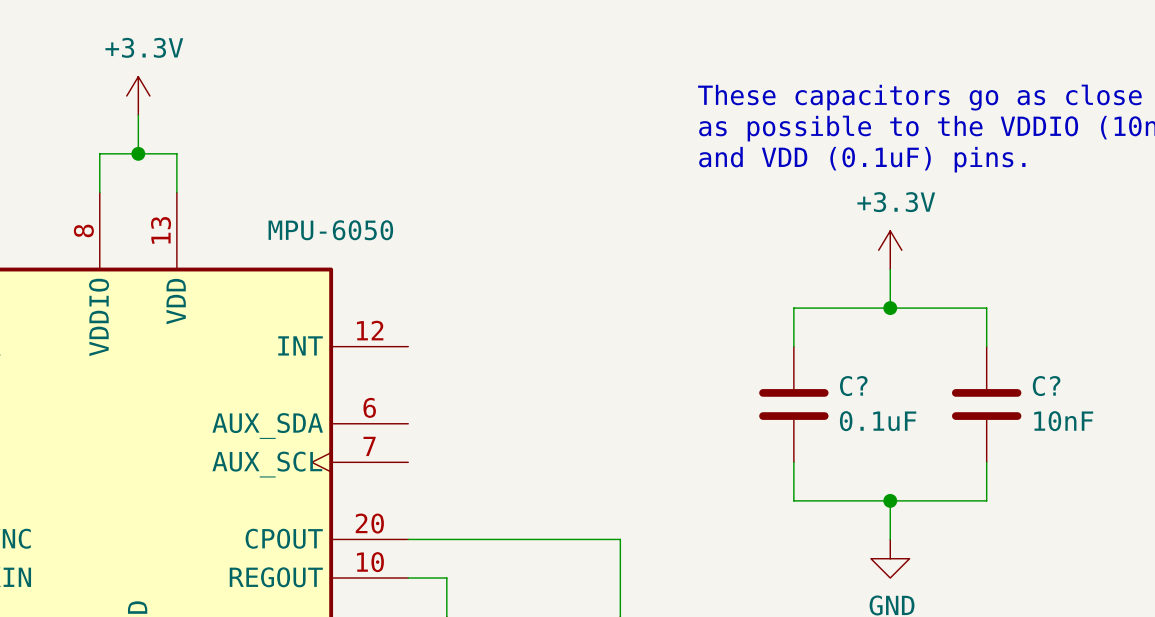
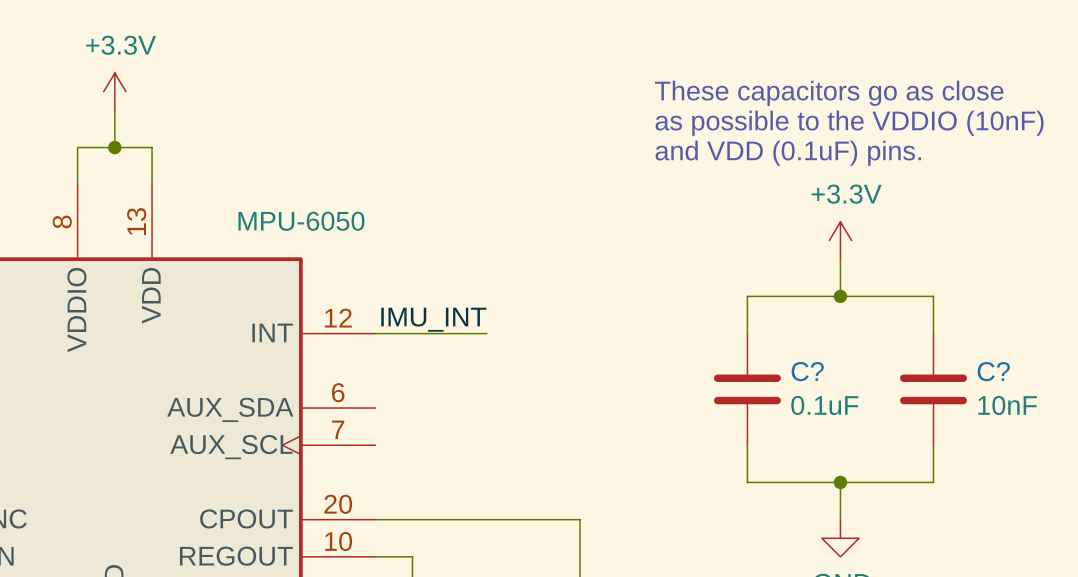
label: none -> IMU_INT (433, 319)
wire: none -> (375, 333) (486, 333)

